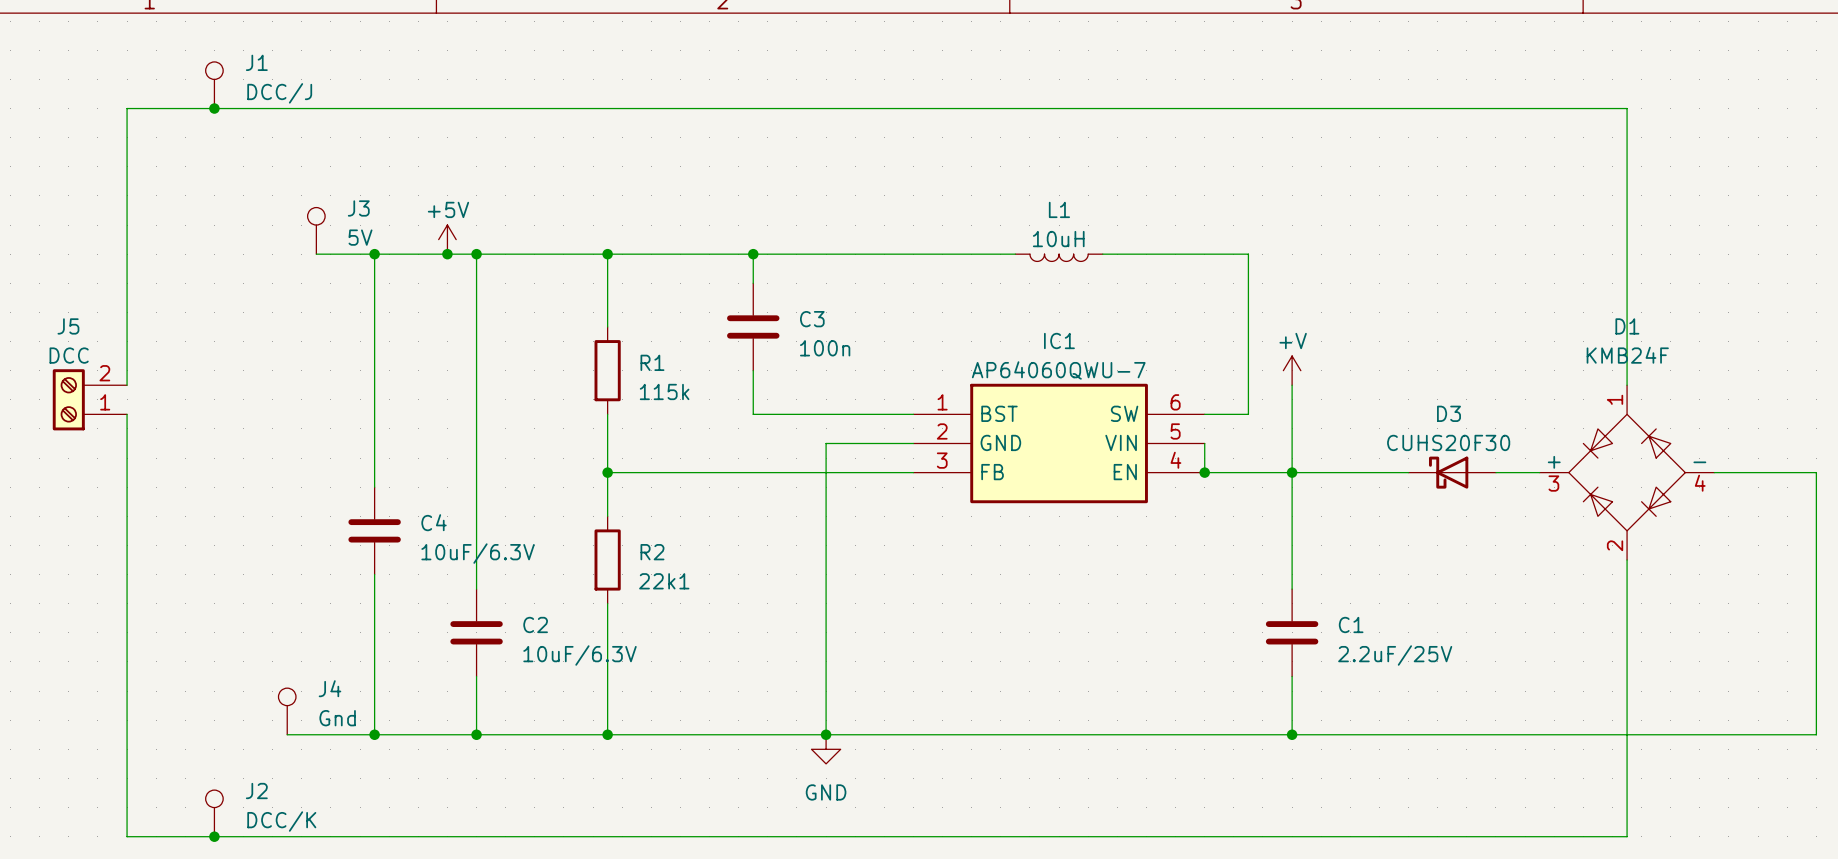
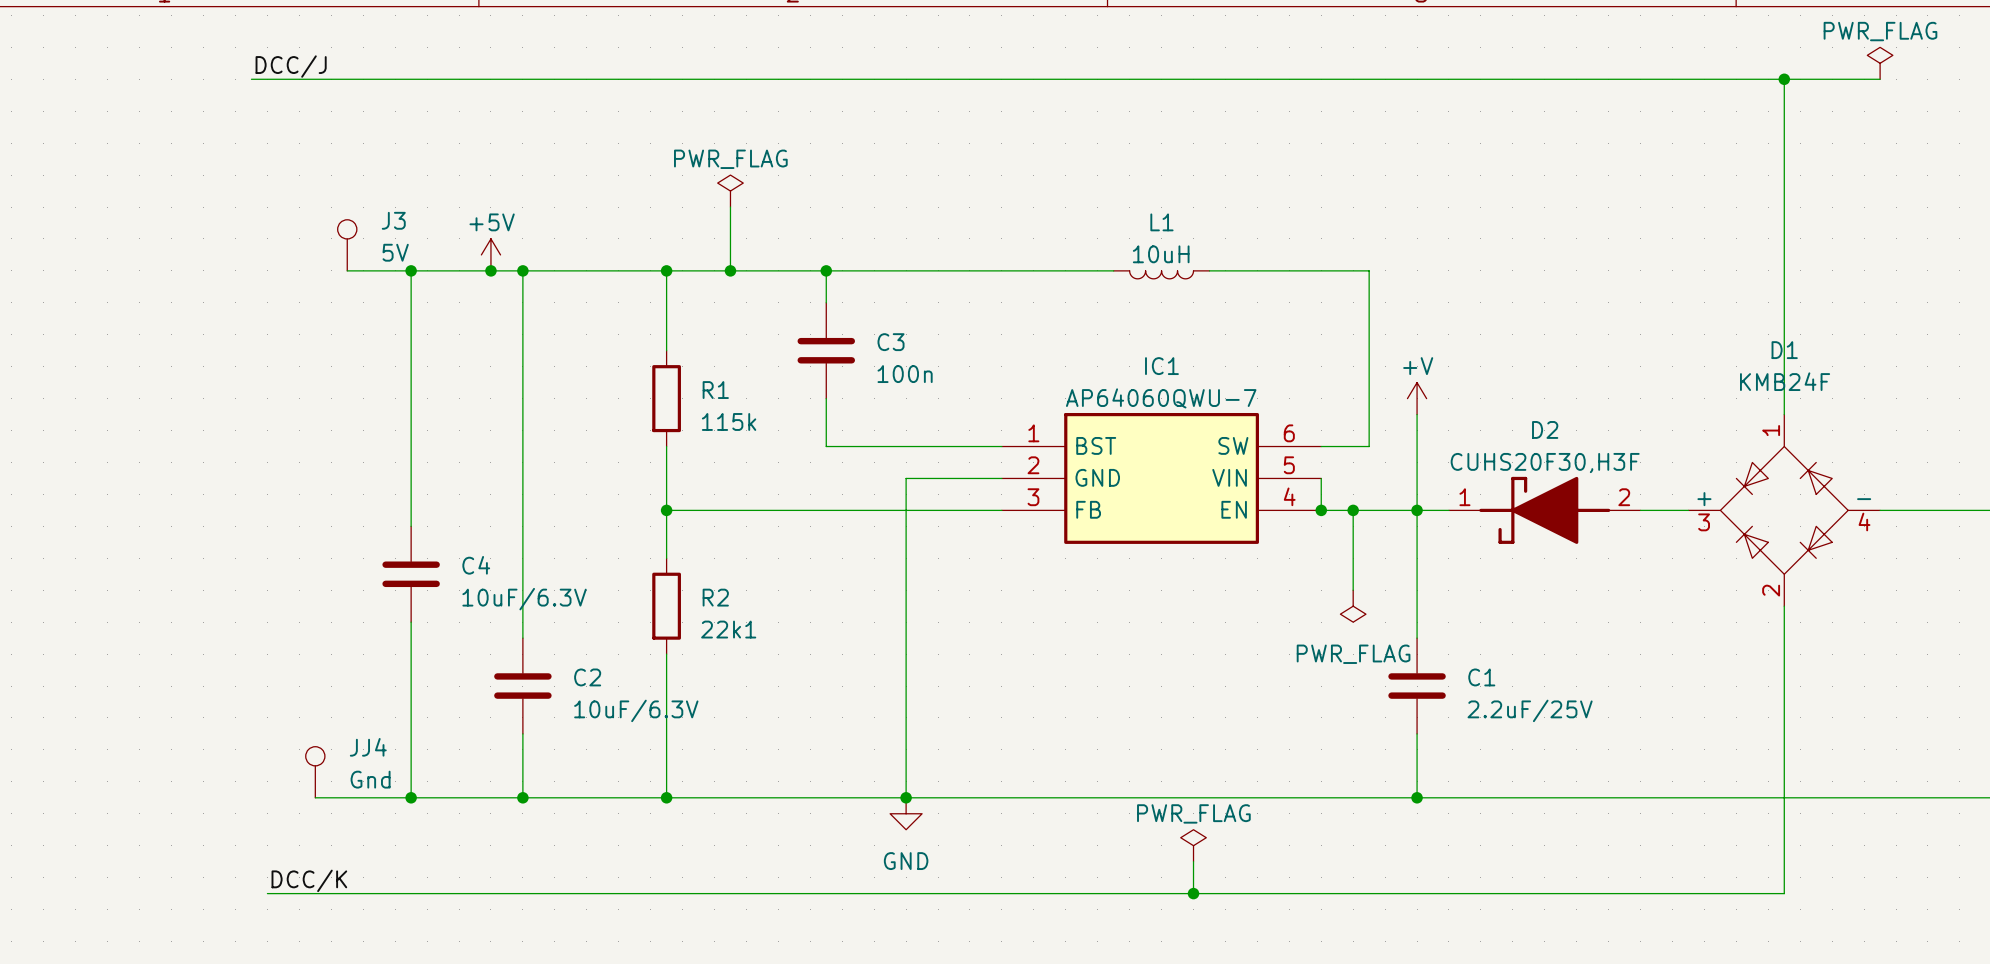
power symbol: none -> PWR_FLAG (1880, 63)
label: none -> DCC/J (291, 66)
wire: none -> (251, 79) (1880, 79)
junction: none -> (1784, 79)
J1: DCC/J (214, 85) -> none
junction: (214, 108) -> none
wire: (1627, 108) (127, 108) (127, 385) -> (1784, 111) (1784, 79)
power symbol: none -> PWR_FLAG (730, 191)
wire: none -> (730, 207) (730, 270)
junction: none -> (730, 270)
J5: DCC (89, 399) -> none
wire: (127, 414) (127, 836) (1627, 836) (1627, 822) -> (267, 893) (1784, 893)
wire: none -> (1353, 510) (1353, 590)
junction: none -> (1353, 510)
D2: none -> CUHS20F30,H3F (1544, 510)
D3: CUHS20F30 (1452, 472) -> none
power symbol: none -> PWR_FLAG (1353, 606)
J4 name: J4 (329, 688) -> JJ4 (368, 747)
power symbol: none -> PWR_FLAG (1193, 845)
wire: none -> (1193, 861) (1193, 893)
label: none -> DCC/K (309, 880)
J2: DCC/K (214, 813) -> none
junction: none -> (1193, 893)
junction: (214, 836) -> none

